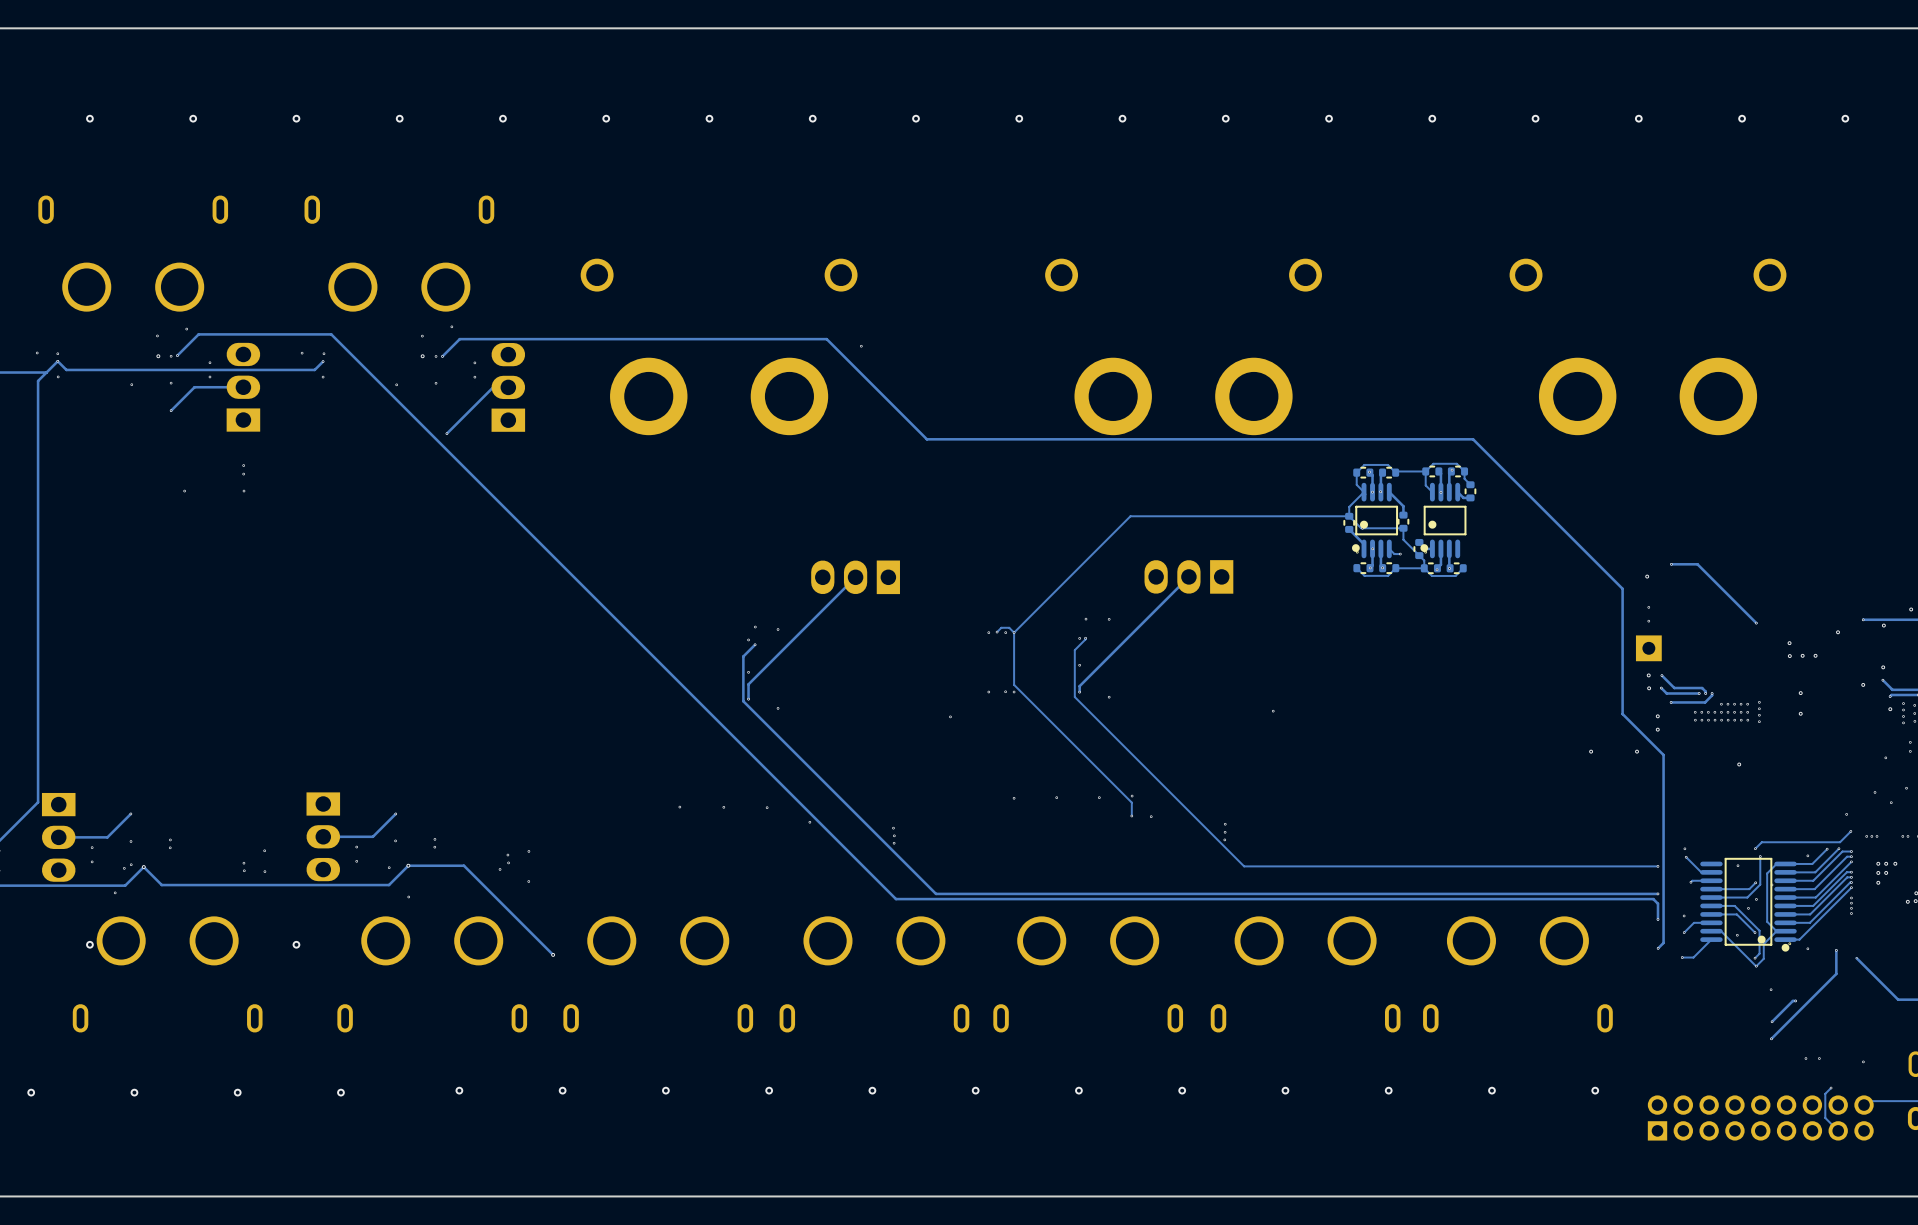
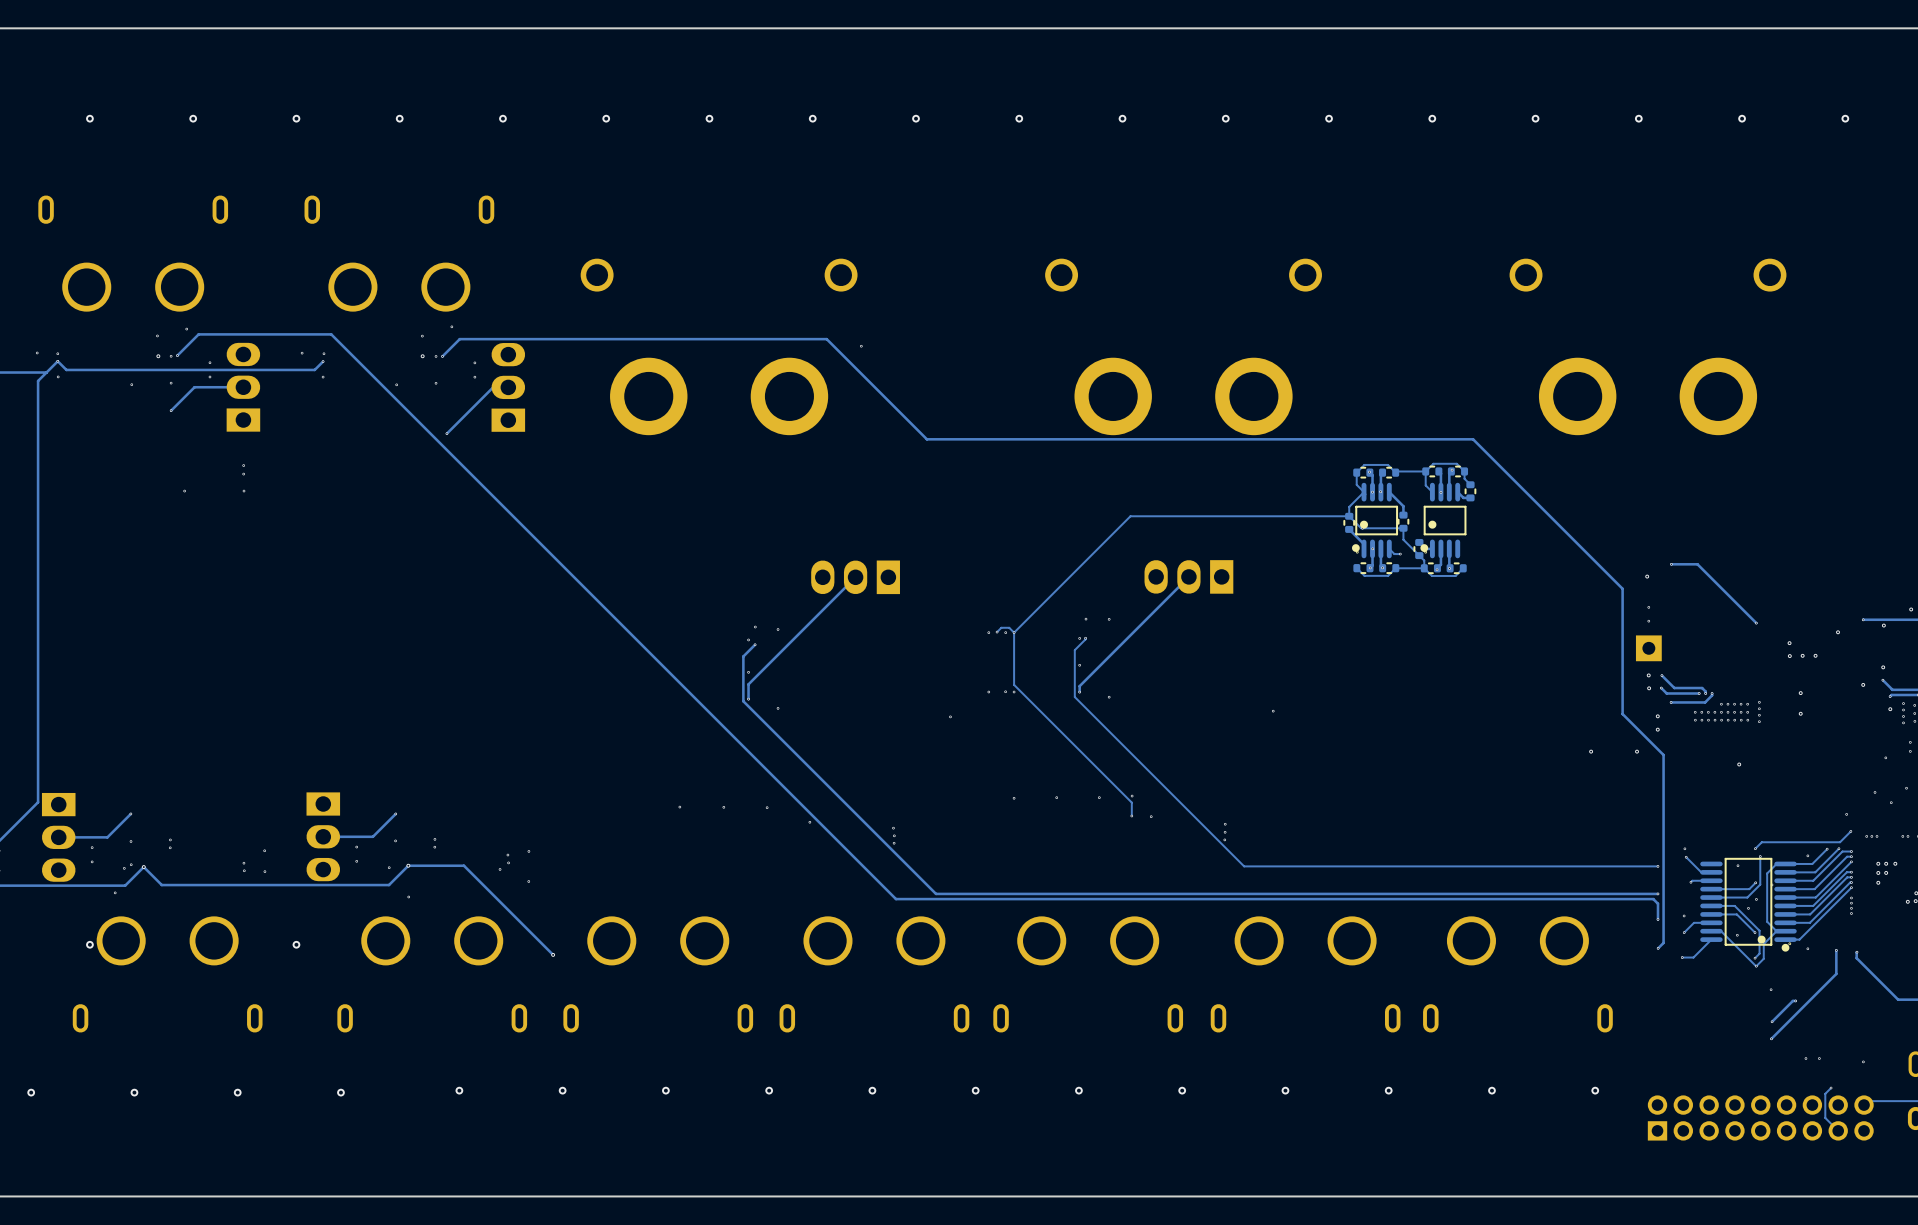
track: none -> (1856, 952) (1856, 958)
via: none -> (1856, 952)
via: (1856, 958) -> none

